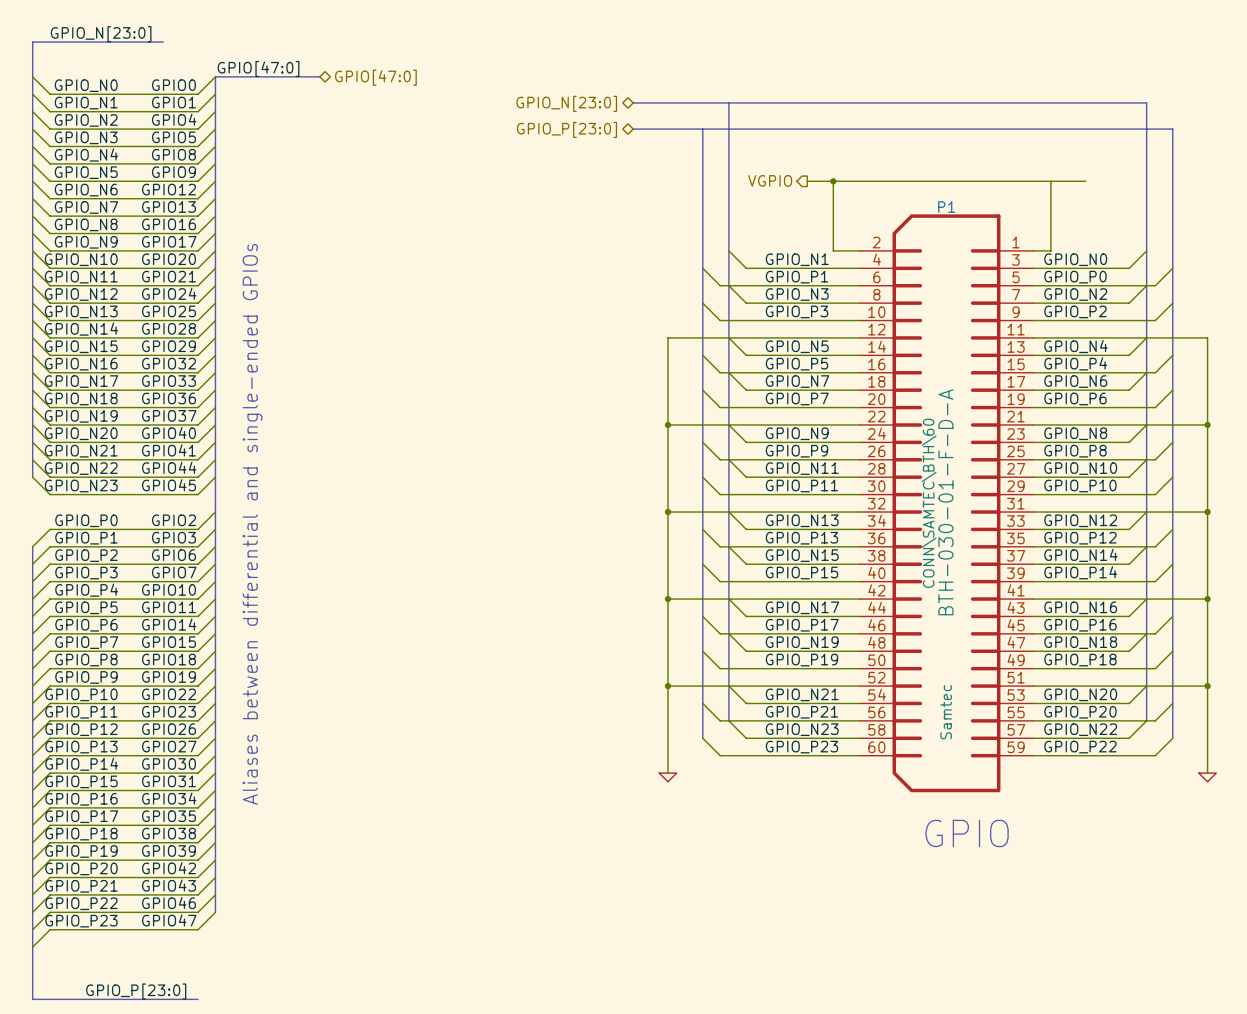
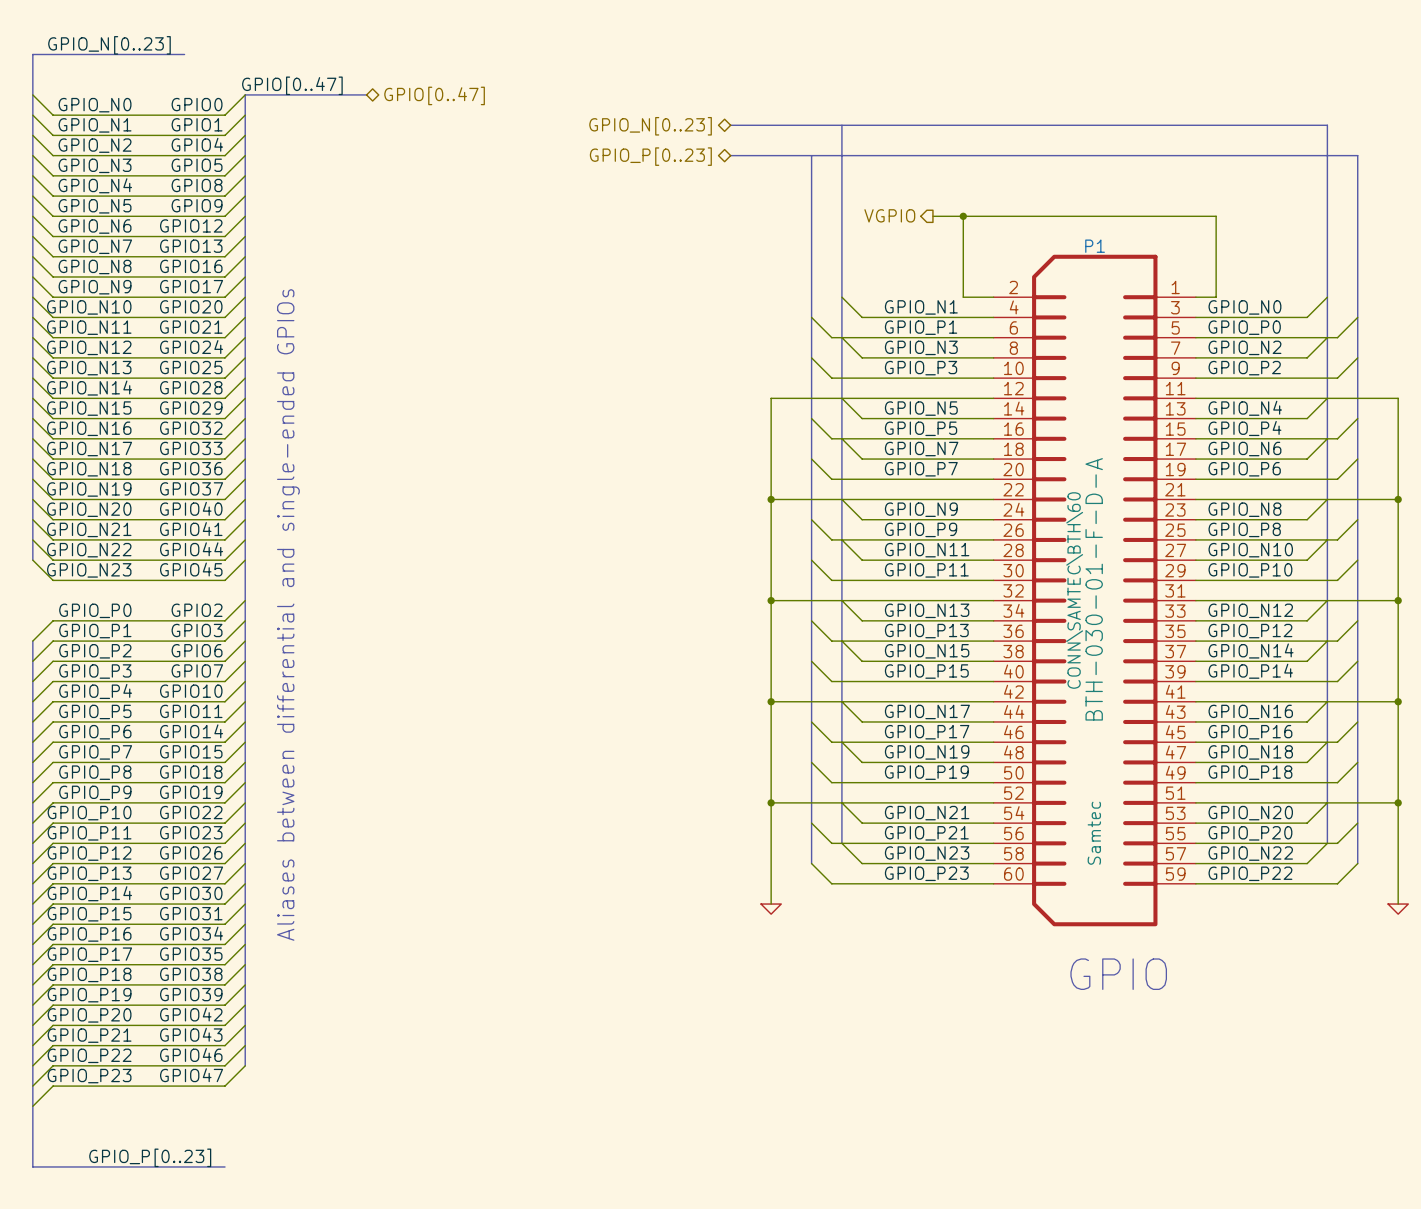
label: GPIO_N[23:0] (101, 34) -> GPIO_N[0..23] (109, 45)
label: GPIO[47:0] (258, 68) -> GPIO[0..47] (292, 85)
hierarchical label: GPIO[47:0] (375, 77) -> GPIO[0..47] (434, 95)
hierarchical label: GPIO_N[23:0] (566, 103) -> GPIO_N[0..23] (650, 126)
hierarchical label: GPIO_P[23:0] (566, 129) -> GPIO_P[0..23] (650, 156)
wire: (1050, 181) (1085, 181) -> none
label: GPIO_P[23:0] (136, 991) -> GPIO_P[0..23] (150, 1157)

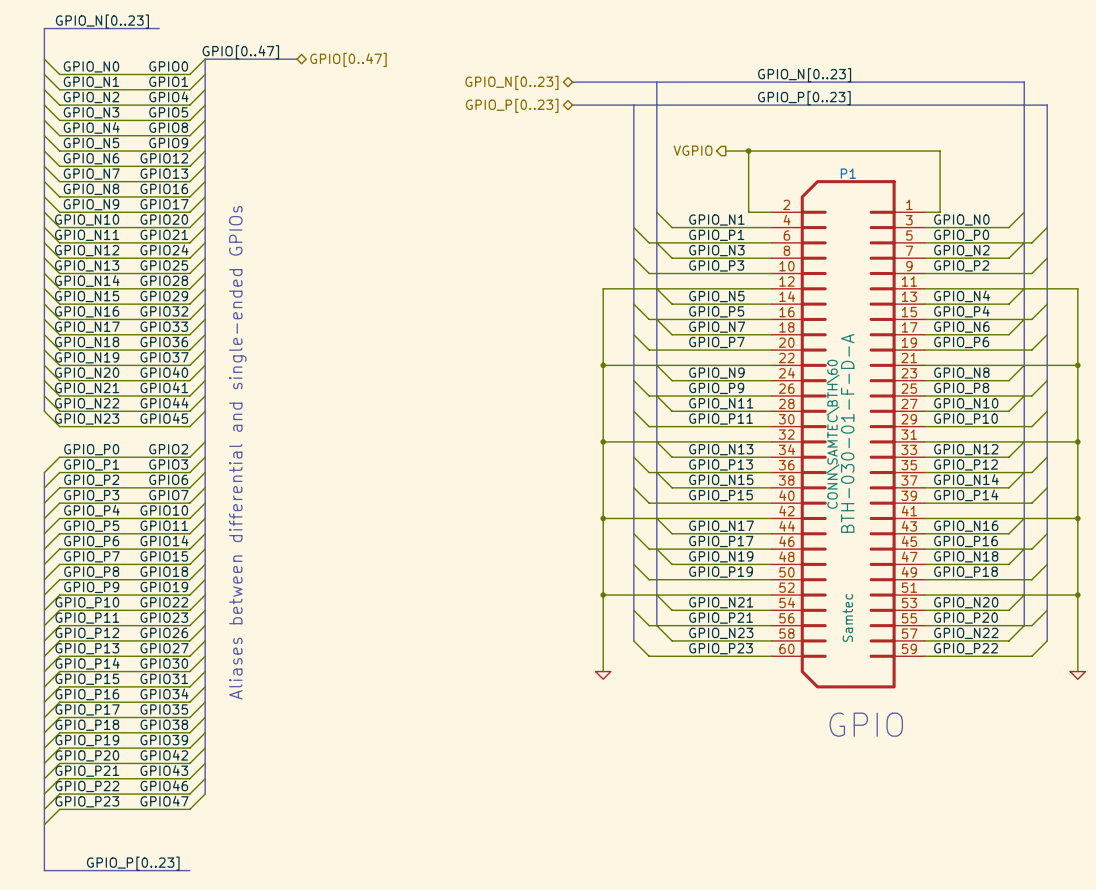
label: none -> GPIO_N[0..23] (804, 75)
label: none -> GPIO_P[0..23] (804, 98)

